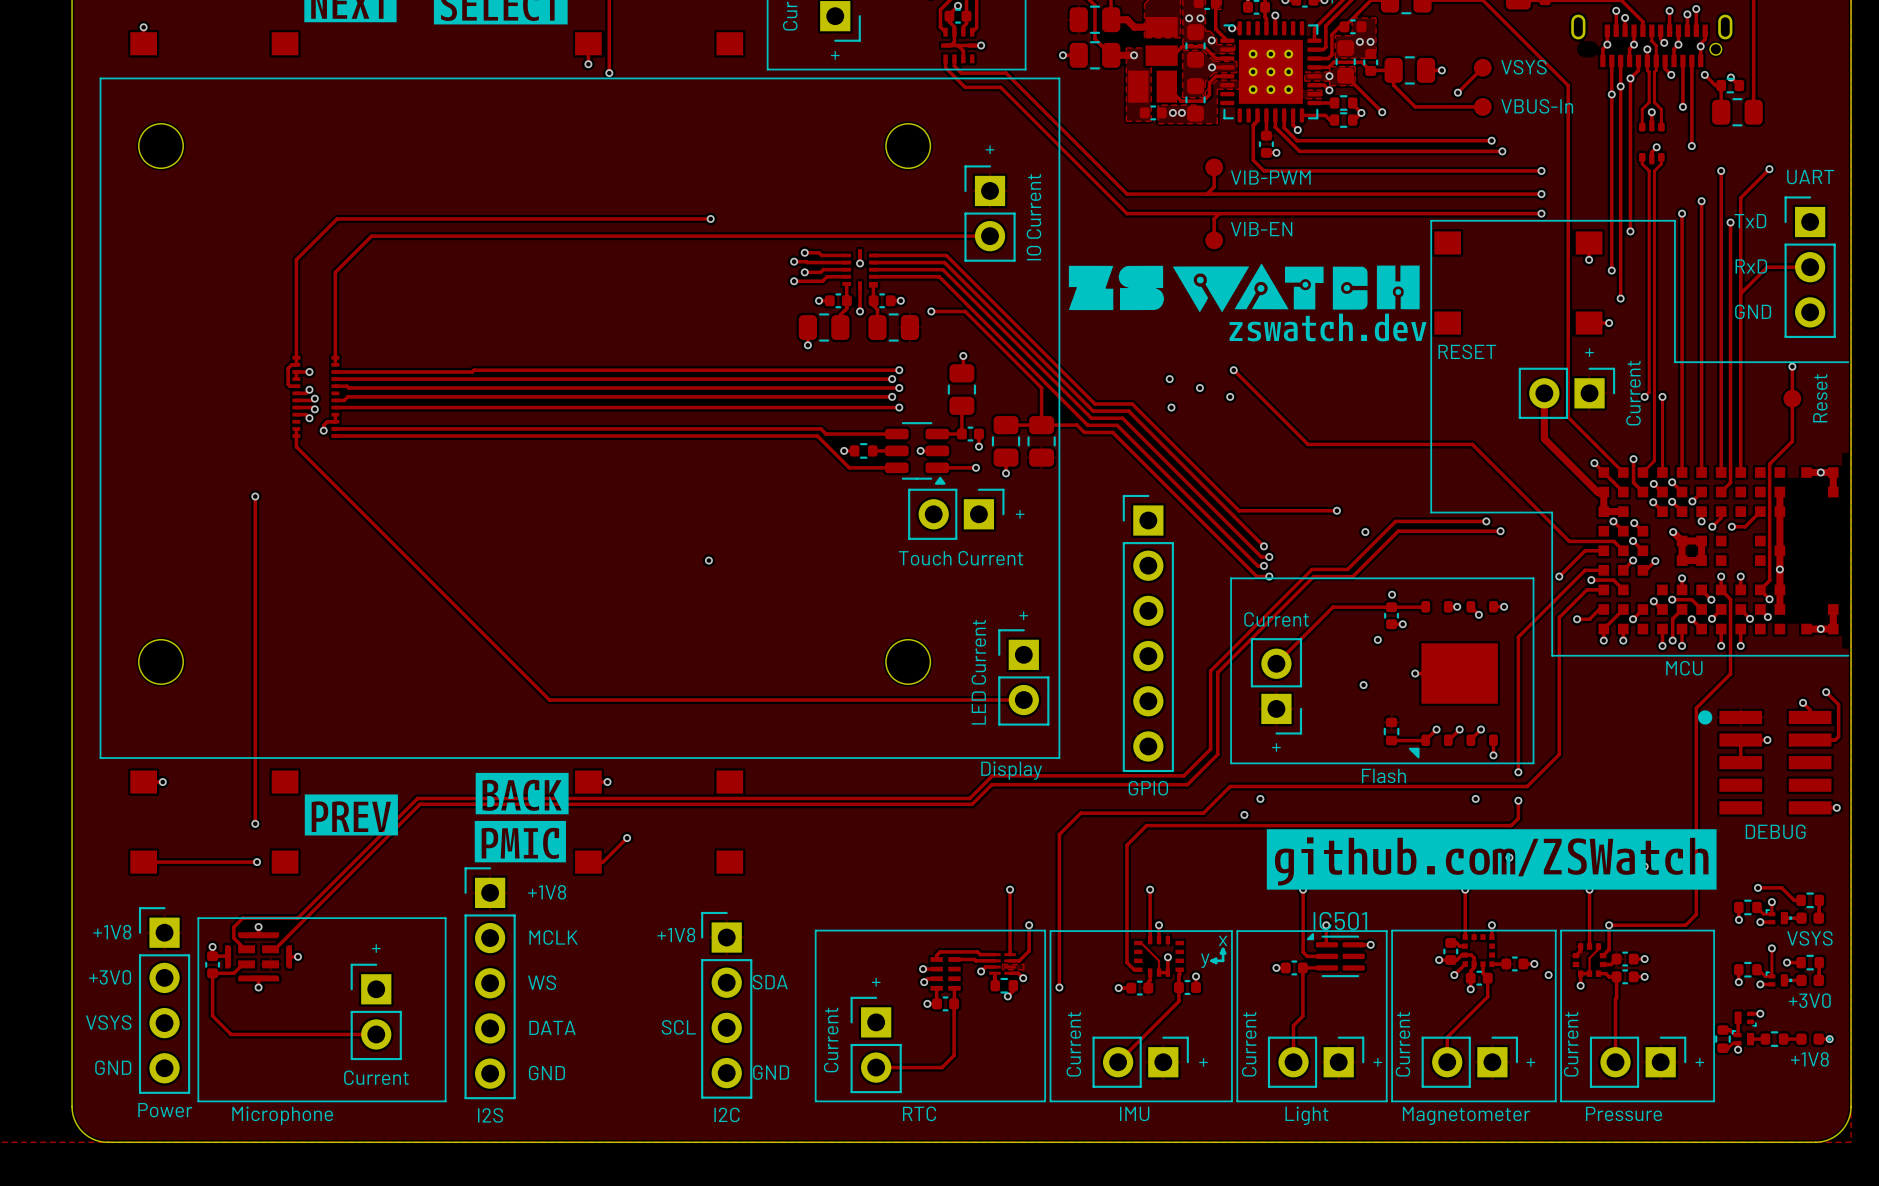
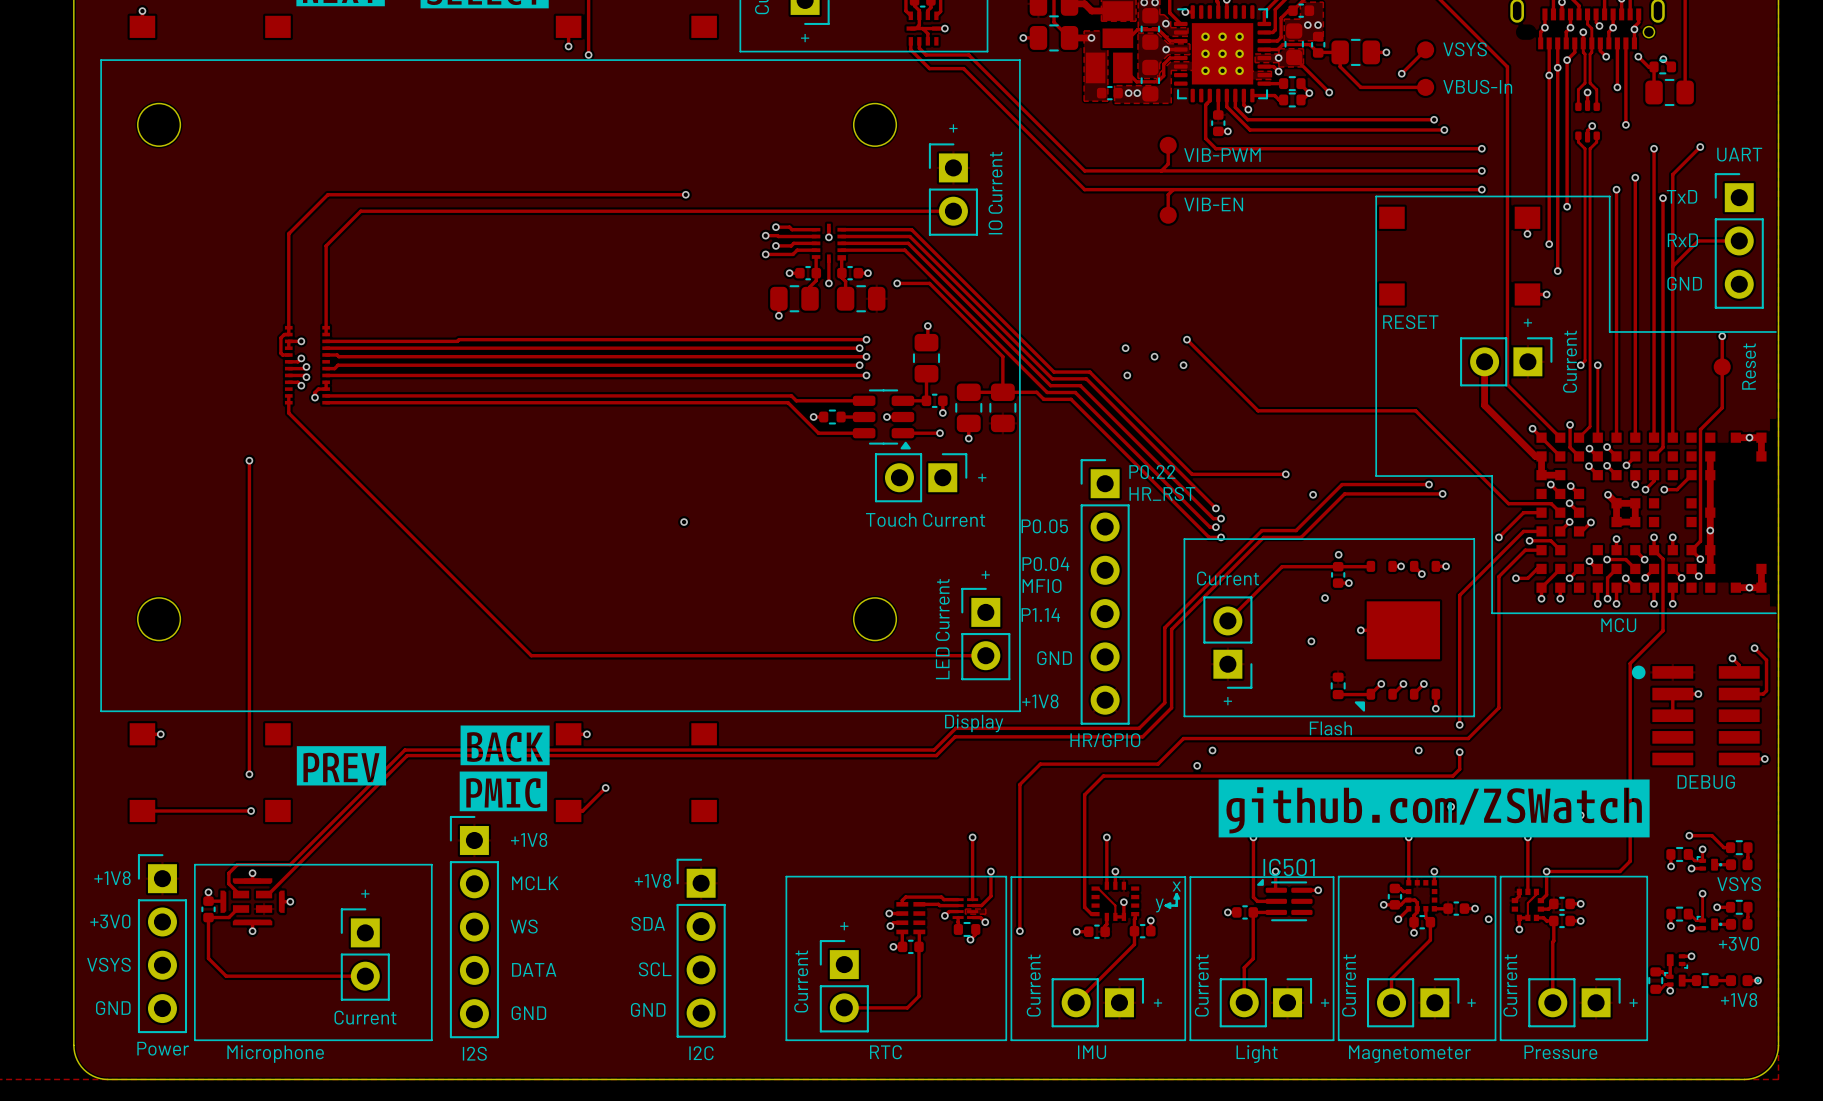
drawing: [1068, 263, 1427, 342] -> none
text: none -> P0.22 (1152, 472)
text: none -> HR_RST (1162, 493)
text: none -> P0.05 (1044, 526)
text: none -> P0.04 (1045, 564)
text: none -> MFIO (1042, 586)
text: none -> P1.14 (1040, 615)
text: none -> GND (1054, 658)
text: none -> +1V8 (1040, 701)
part value: GPIO (1148, 788) -> HR/GPIO (1105, 740)
text position: SDA (770, 982) -> SDA (648, 923)
text position: GND (771, 1072) -> GND (648, 1009)

